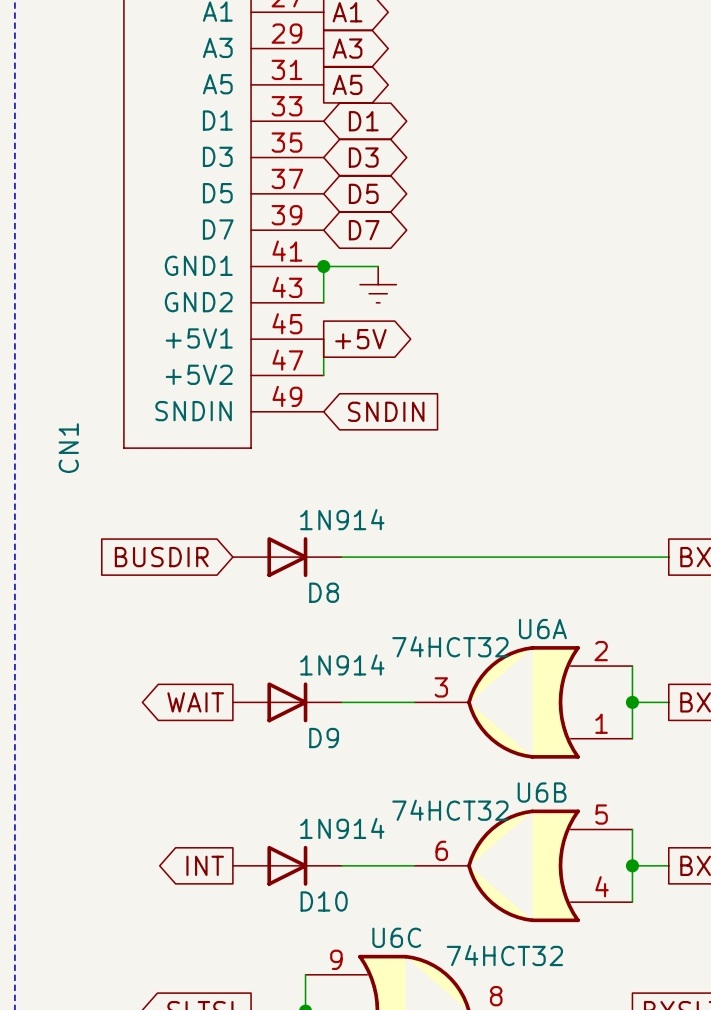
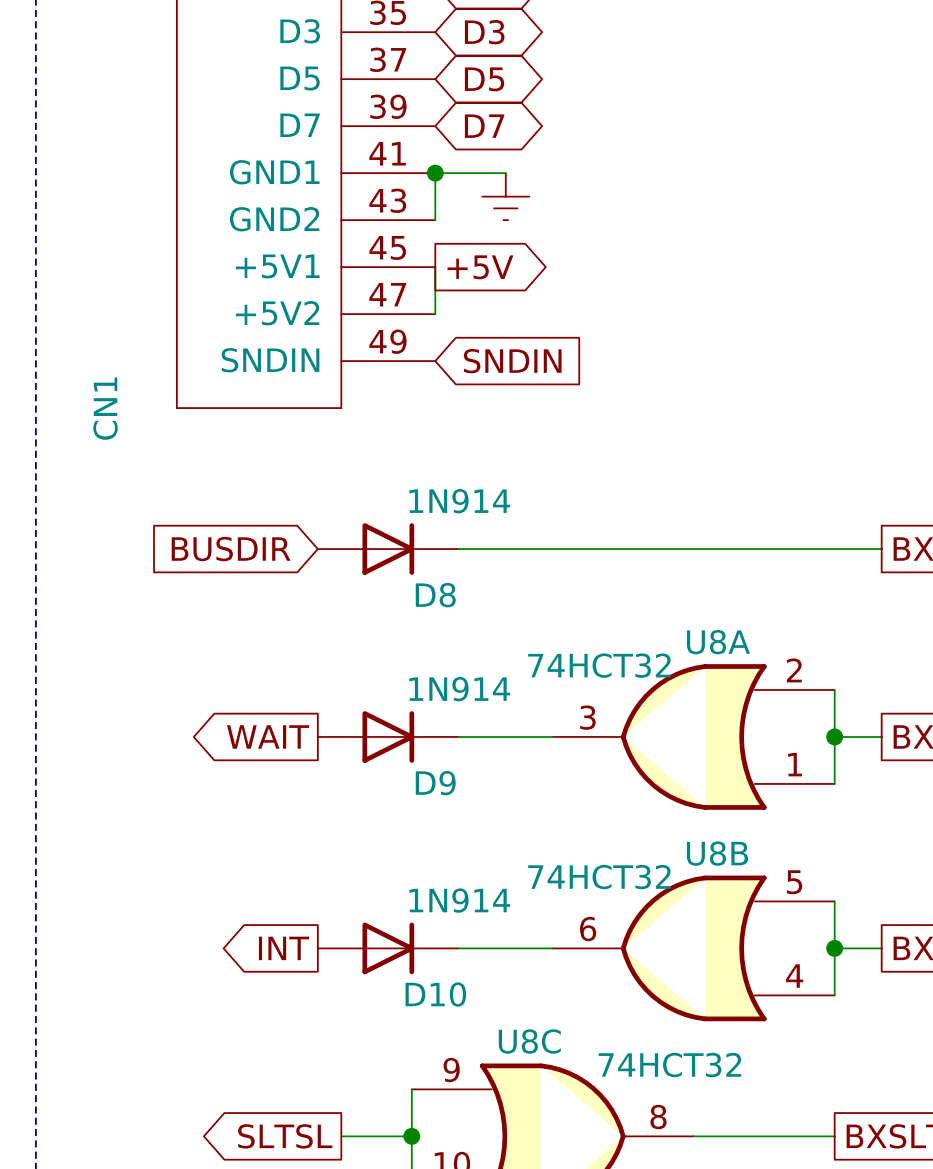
U6A name: U6A (542, 629) -> U8A (718, 642)
U6B name: U6B (542, 792) -> U8B (717, 853)
U6C name: U6C (396, 937) -> U8C (529, 1041)

